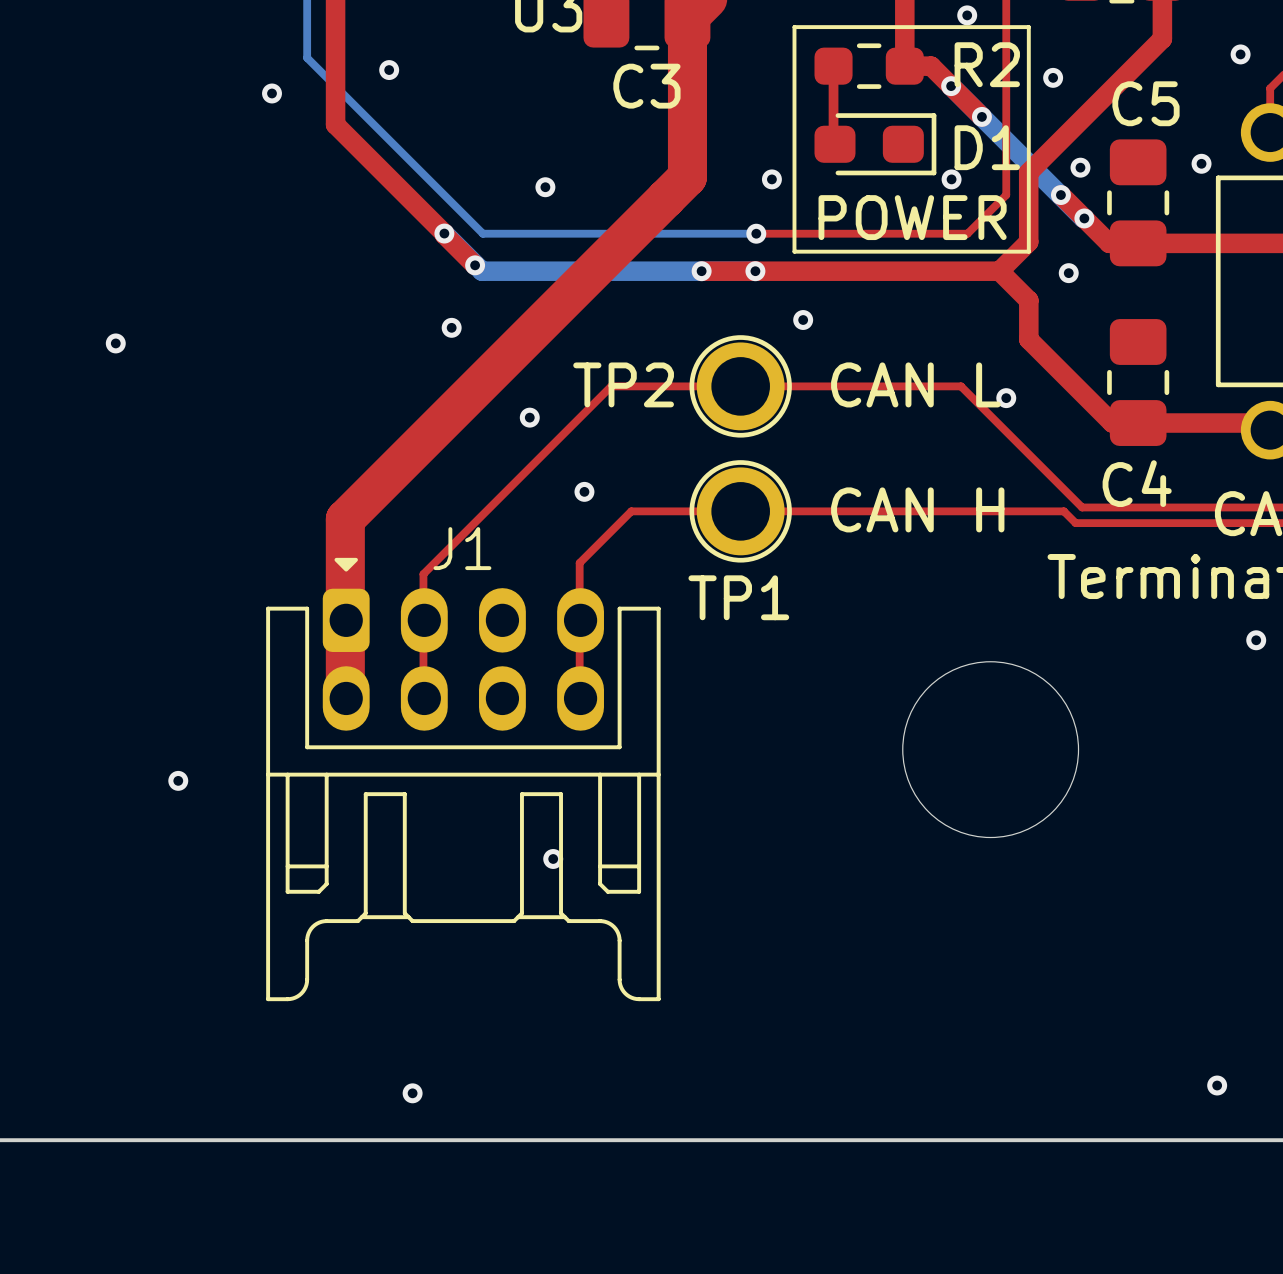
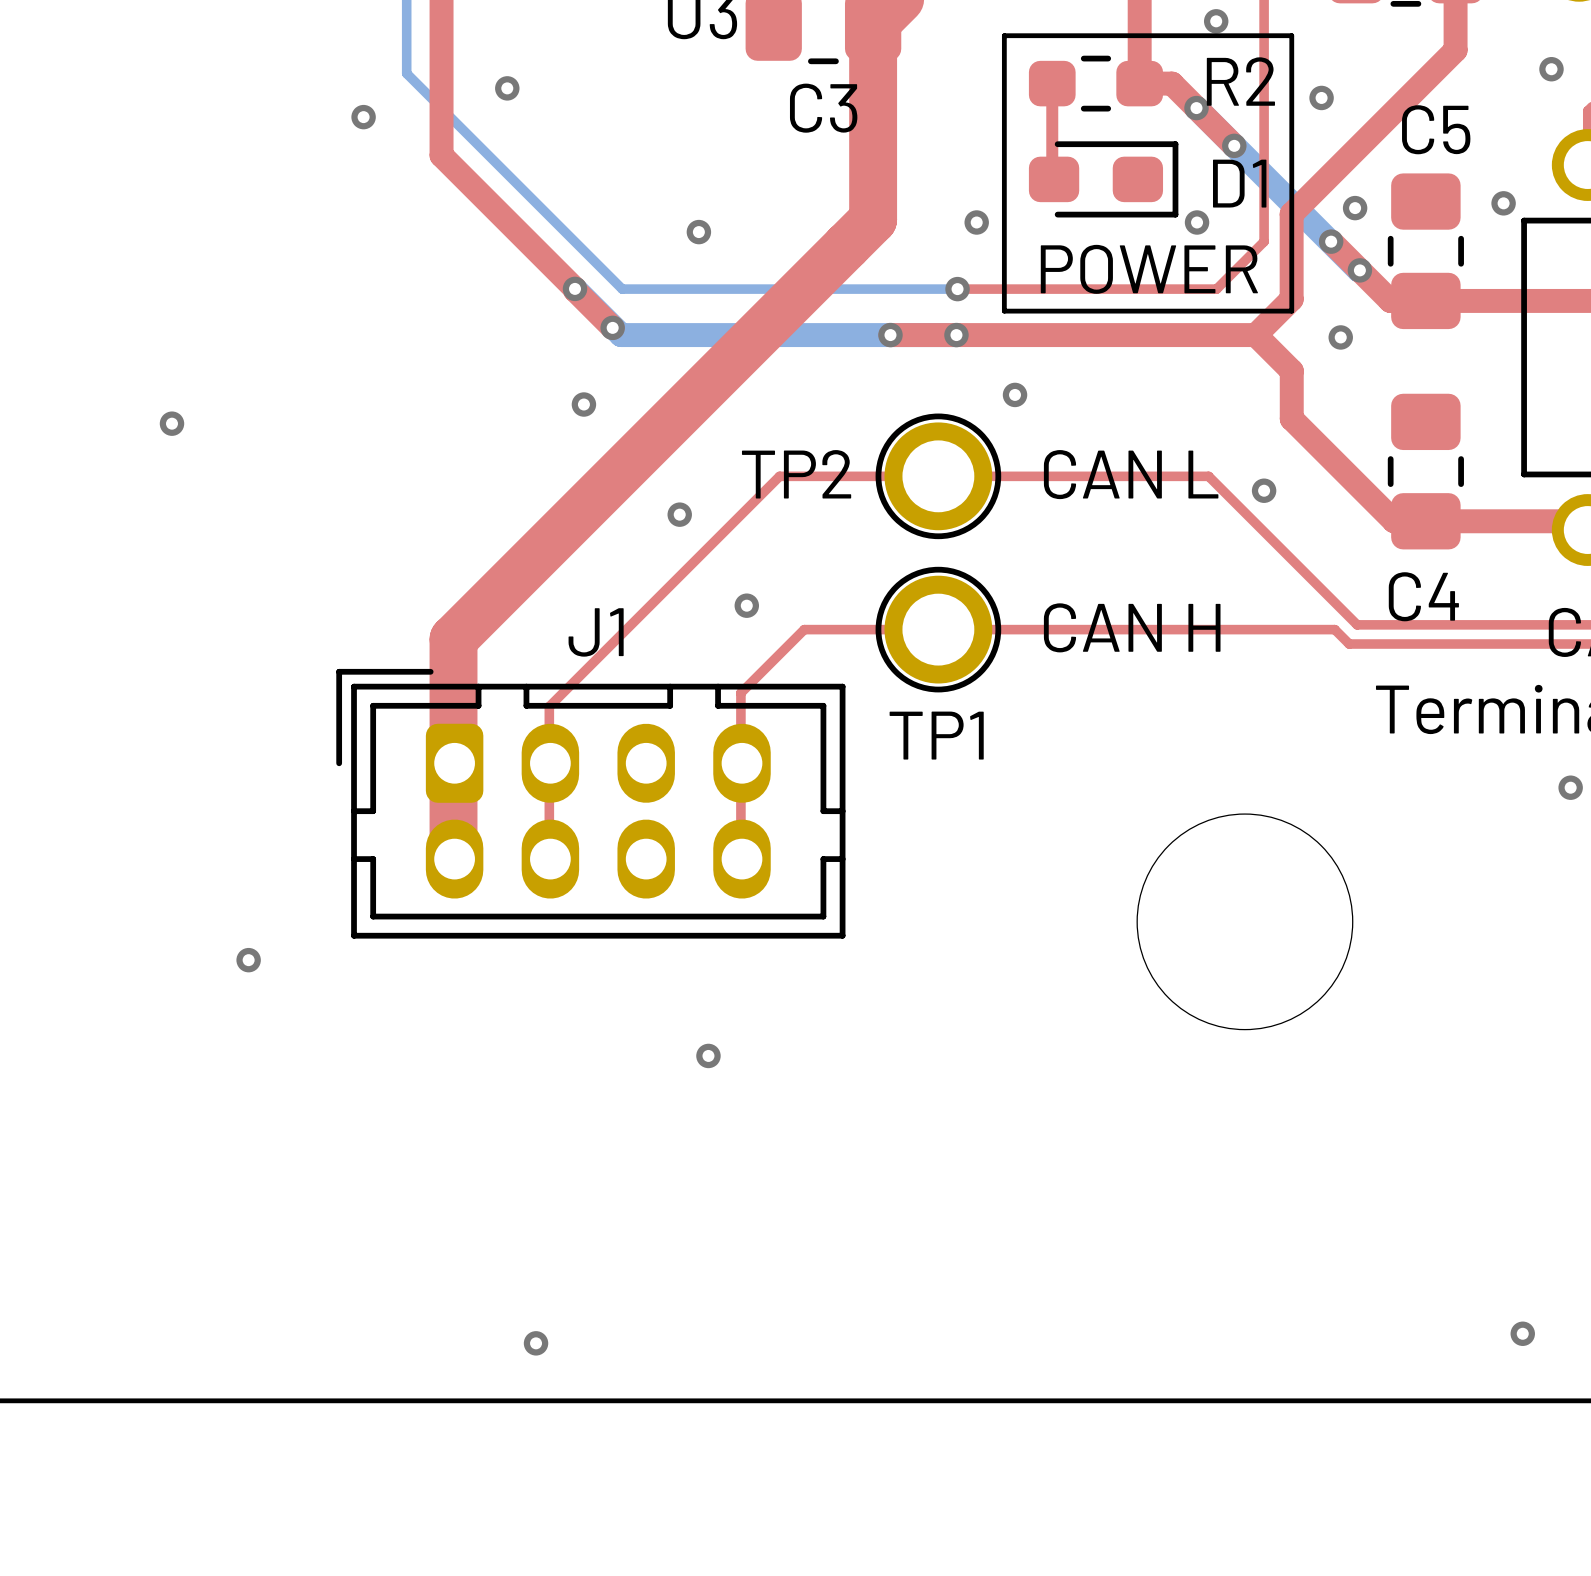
J1 name position: J1 (462, 548) -> J1 (596, 632)
J1 footprint: [266, 557, 661, 1002] -> [336, 668, 846, 939]

